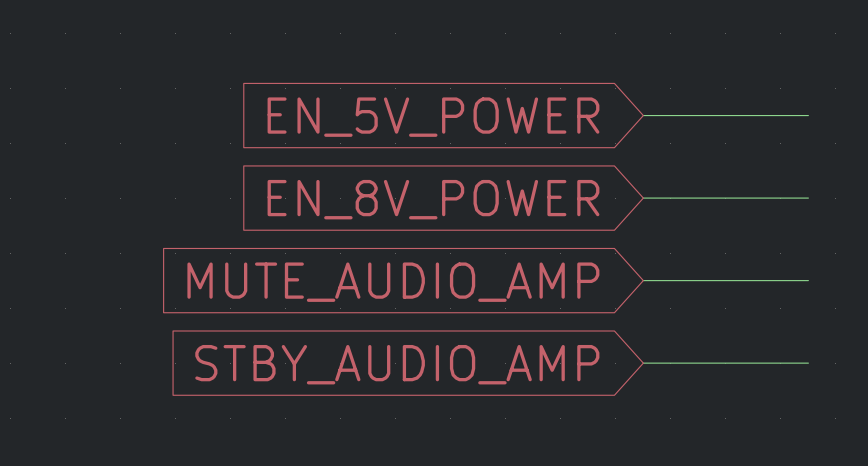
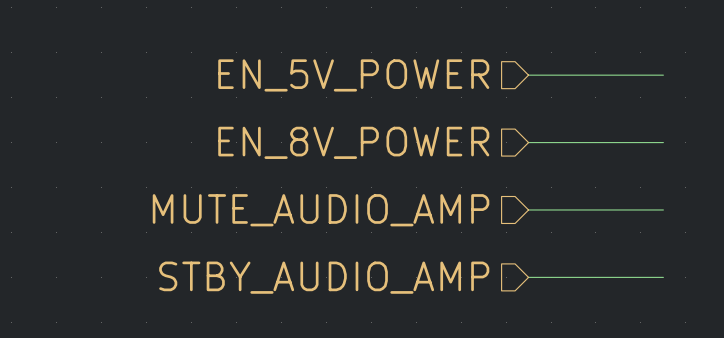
hierarchical label: none -> EN_5V_POWER (353, 75)
global label: EN_5V_POWER (433, 117) -> none
hierarchical label: none -> EN_8V_POWER (353, 142)
global label: EN_8V_POWER (433, 199) -> none
hierarchical label: none -> MUTE_AUDIO_AMP (321, 210)
global label: MUTE_AUDIO_AMP (393, 282) -> none
hierarchical label: none -> STBY_AUDIO_AMP (324, 277)
global label: STBY_AUDIO_AMP (397, 364) -> none

